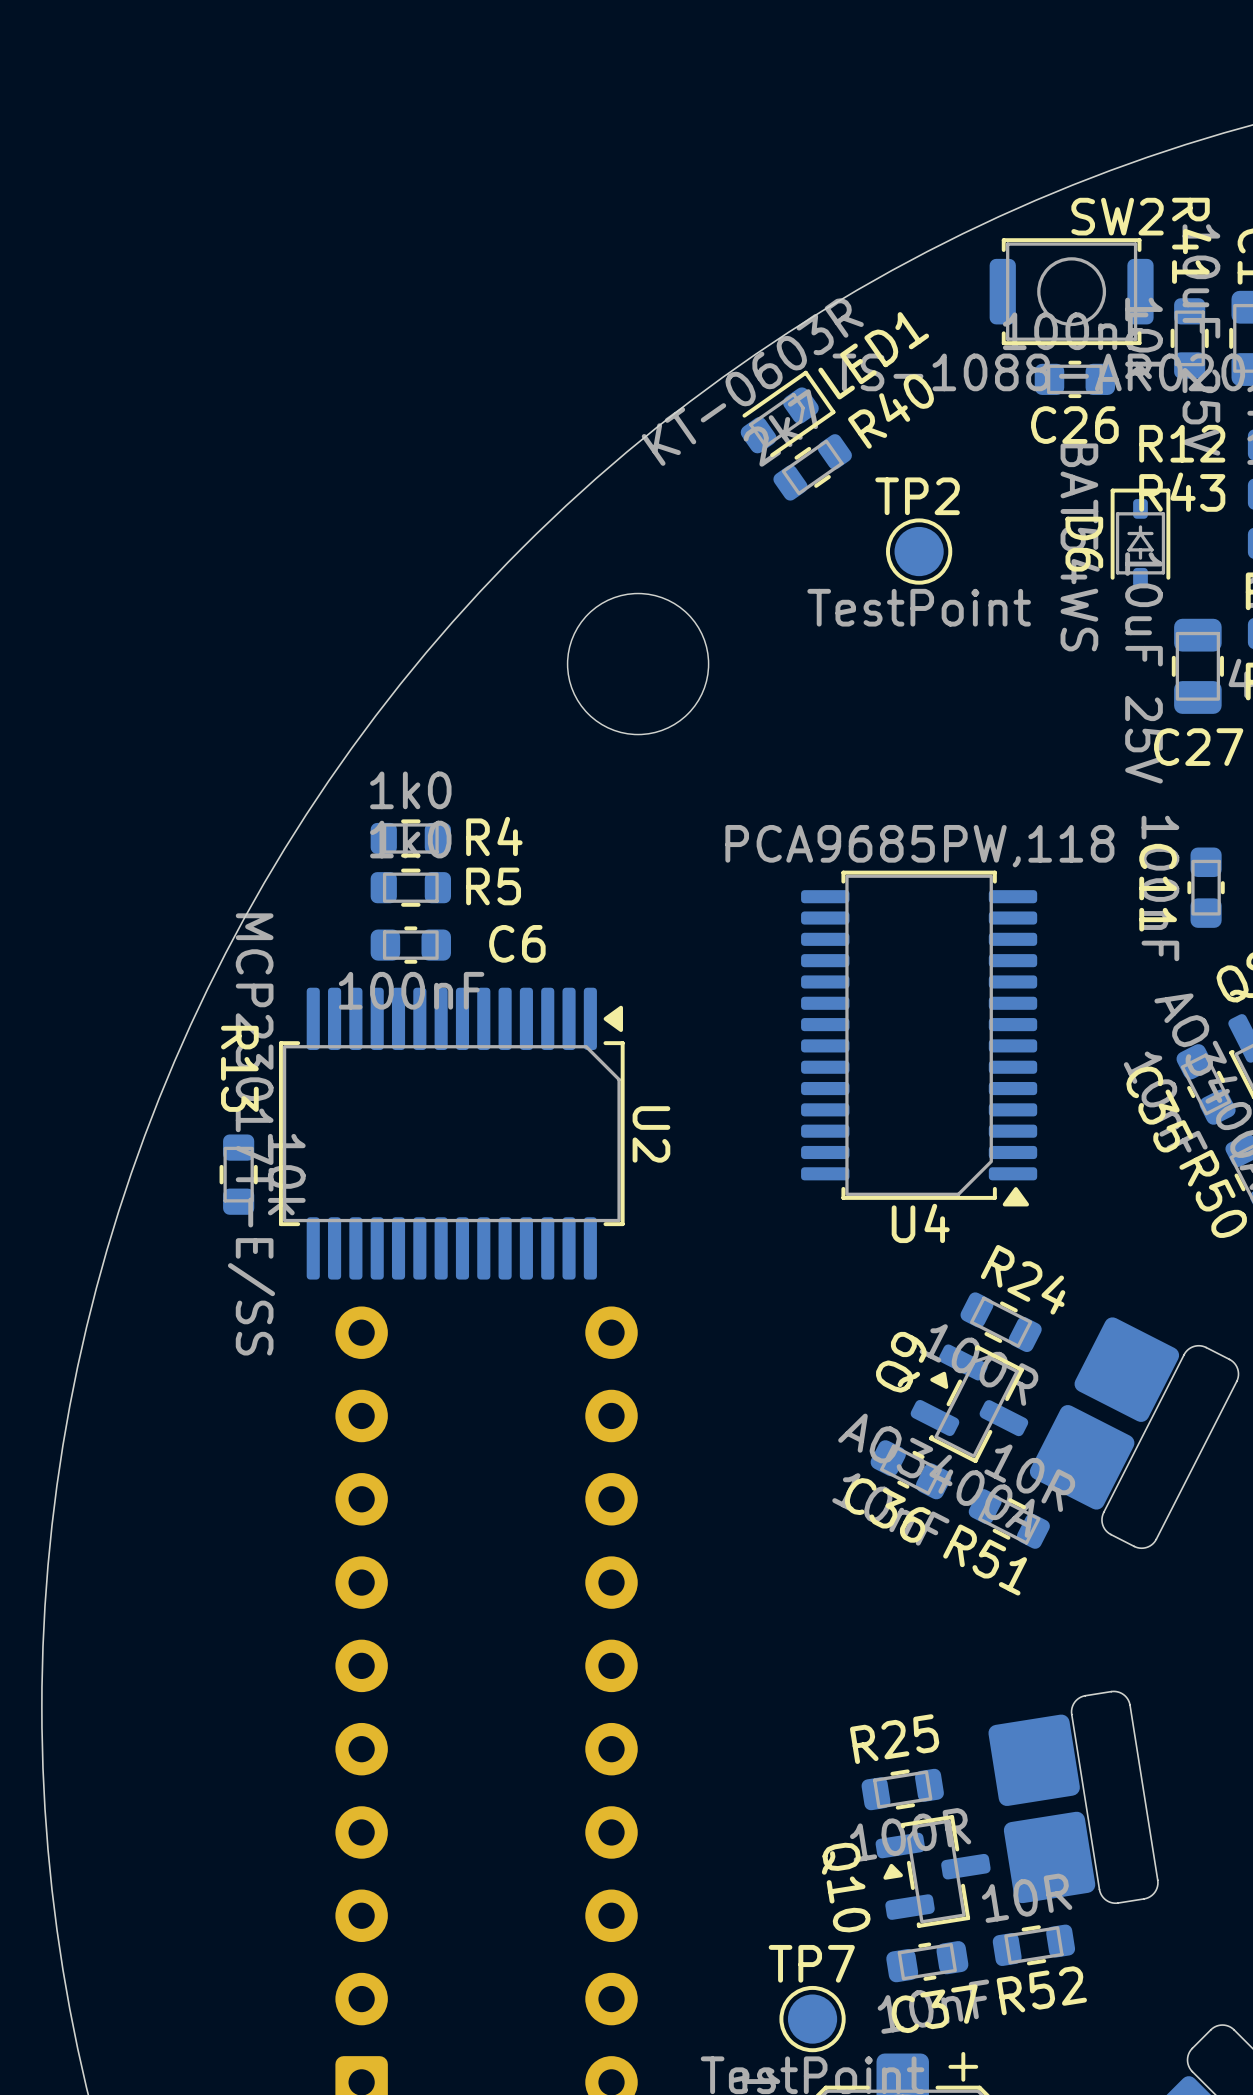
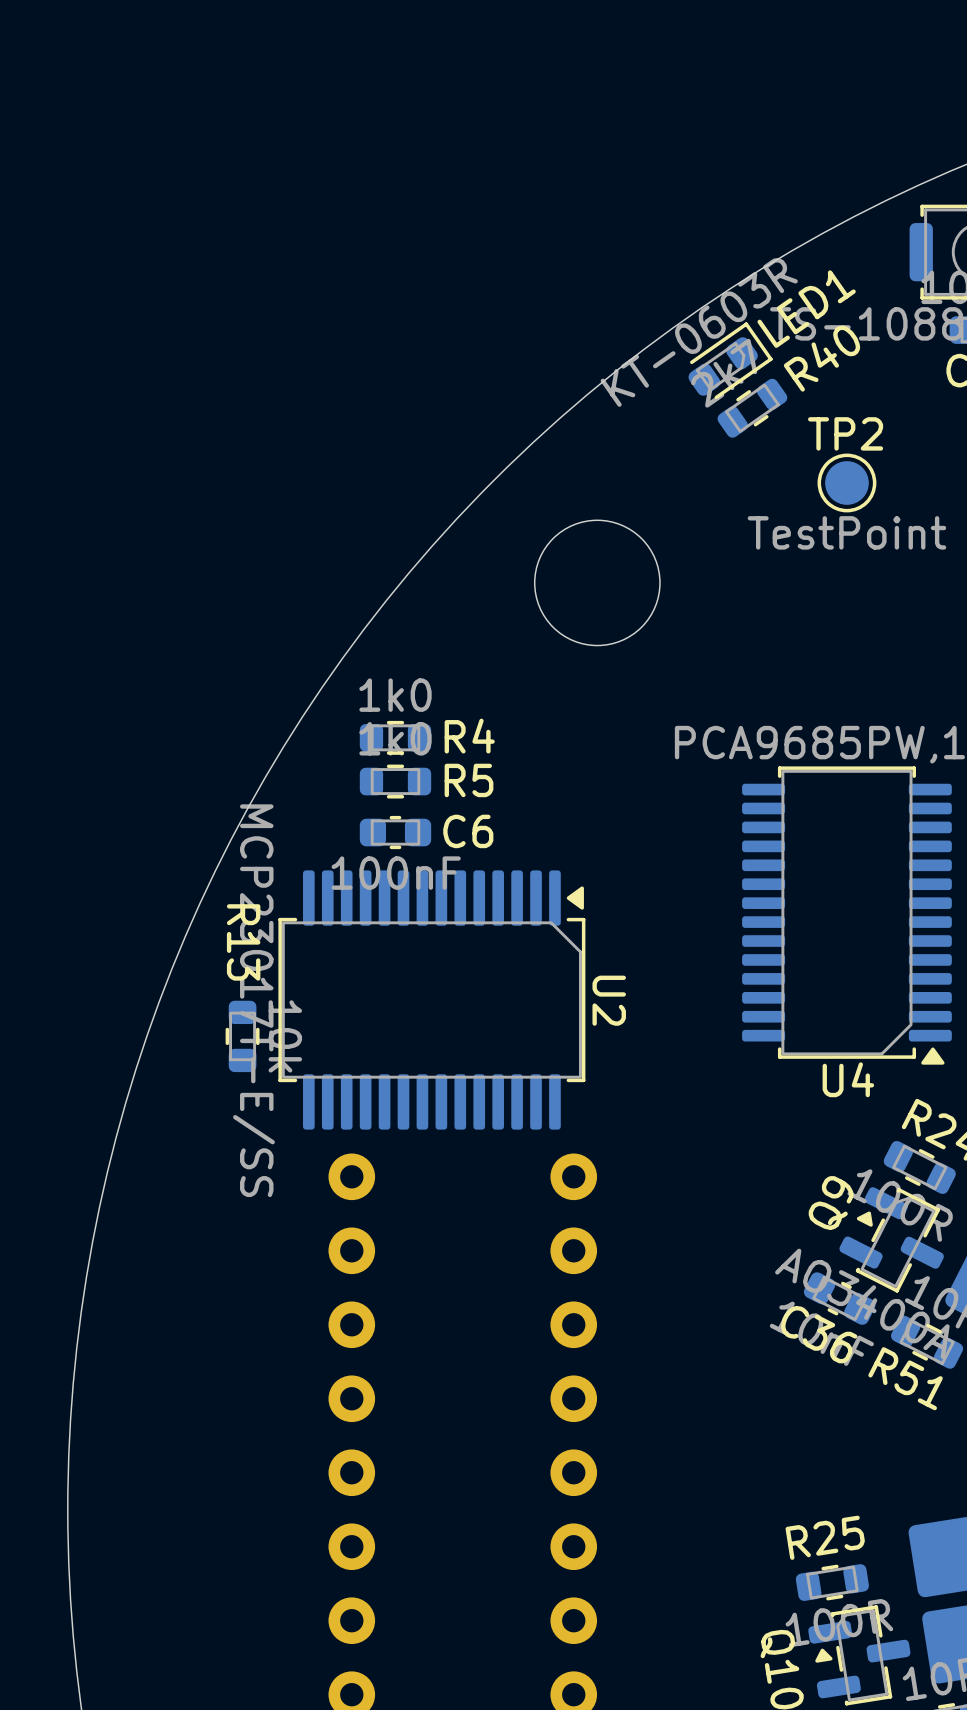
C6 name position: C6 (517, 943) -> C6 (468, 831)

